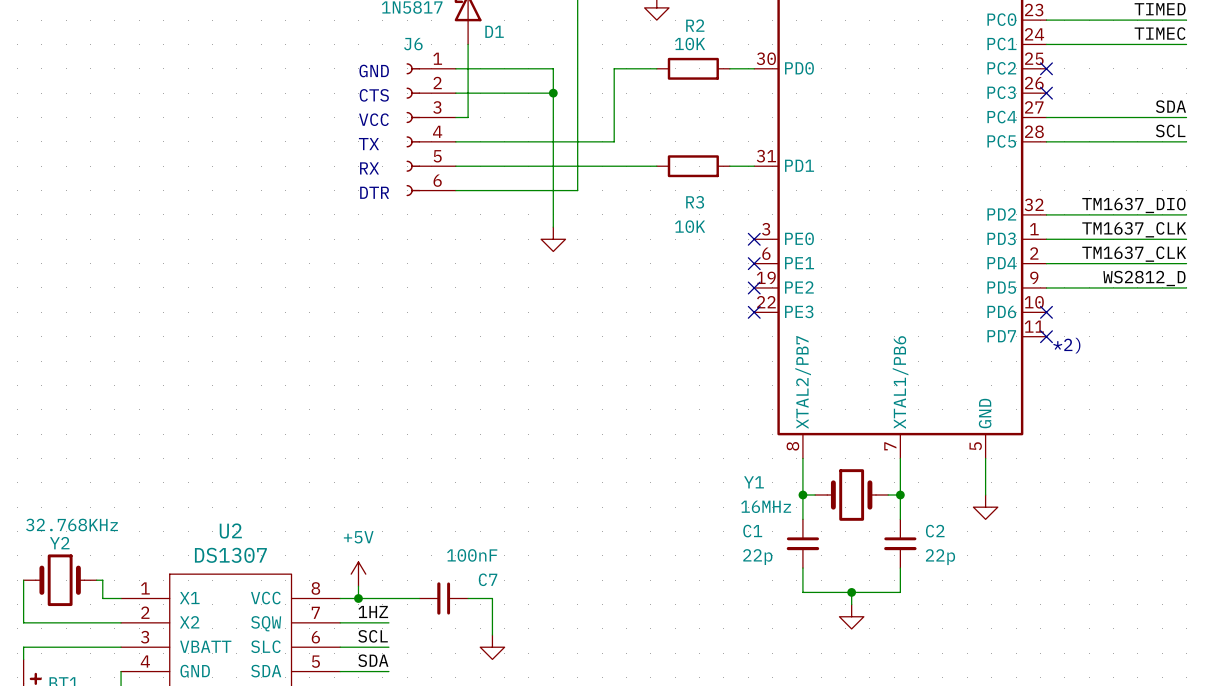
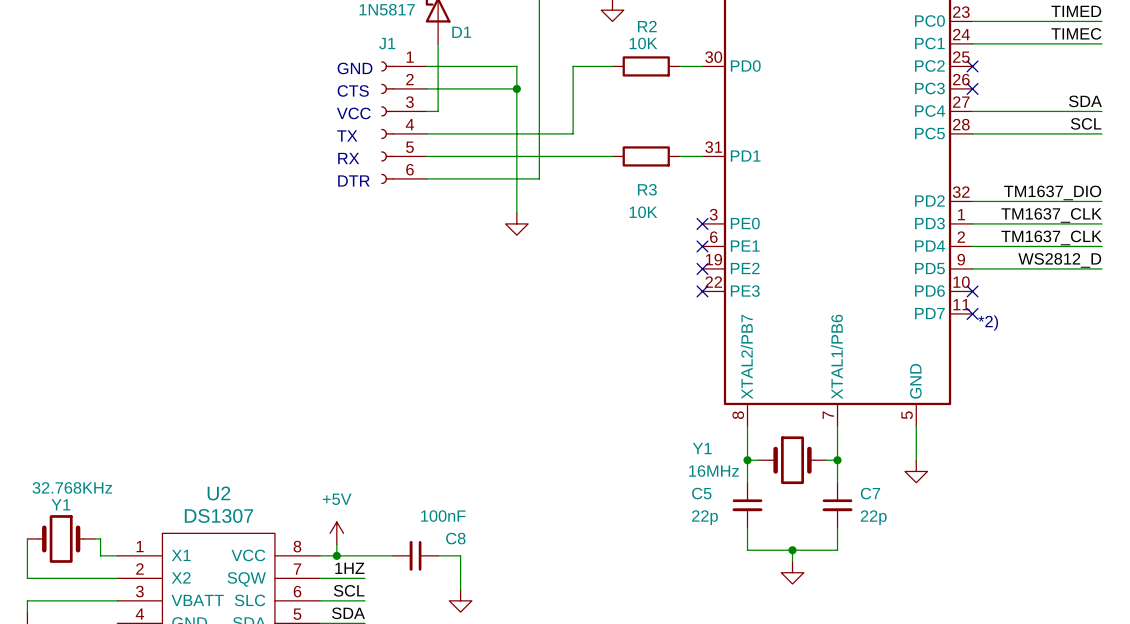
J6 name: J6 (413, 44) -> J1 (387, 43)
C1 name: C1 (752, 531) -> C5 (701, 493)
C2 name: C2 (935, 531) -> C7 (870, 493)
Y2 name: Y2 (59, 543) -> Y1 (60, 504)
C7 name: C7 (488, 579) -> C8 (455, 538)

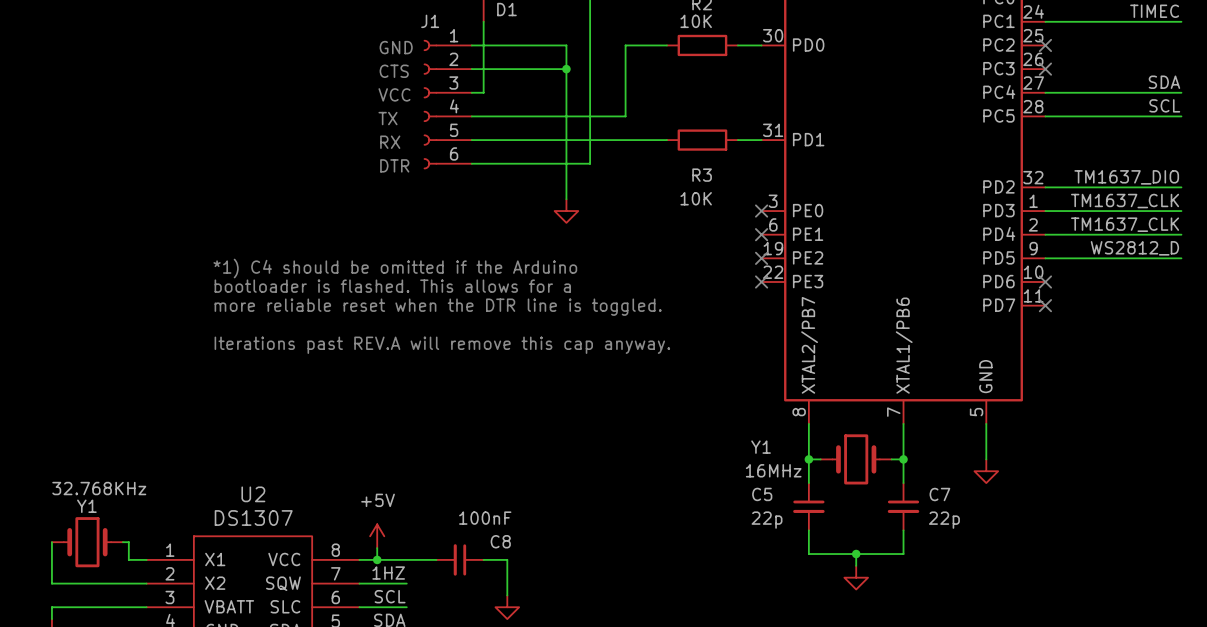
text: none -> *1) C4 should be omitted if the Arduino (395, 268)
text: none -> bootloader is flashed. This allows for a (392, 286)
text: none -> more reliable reset when the DTR line is toggled. (438, 307)
text: *2) (988, 323) -> none
text: none -> Iterations past REV.A will remove this cap anyway. (442, 345)

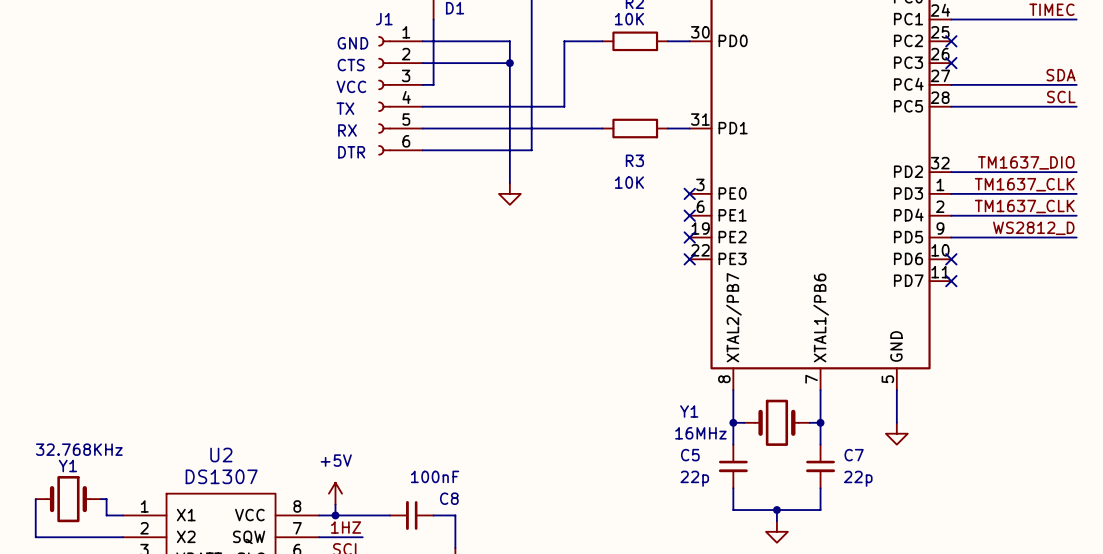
text: *1) C4 should be omitted if the Arduino (395, 268) -> none
text: bootloader is flashed. This allows for a (392, 286) -> none
text: more reliable reset when the DTR line is toggled. (438, 307) -> none
text: Iterations past REV.A will remove this cap anyway. (442, 345) -> none

